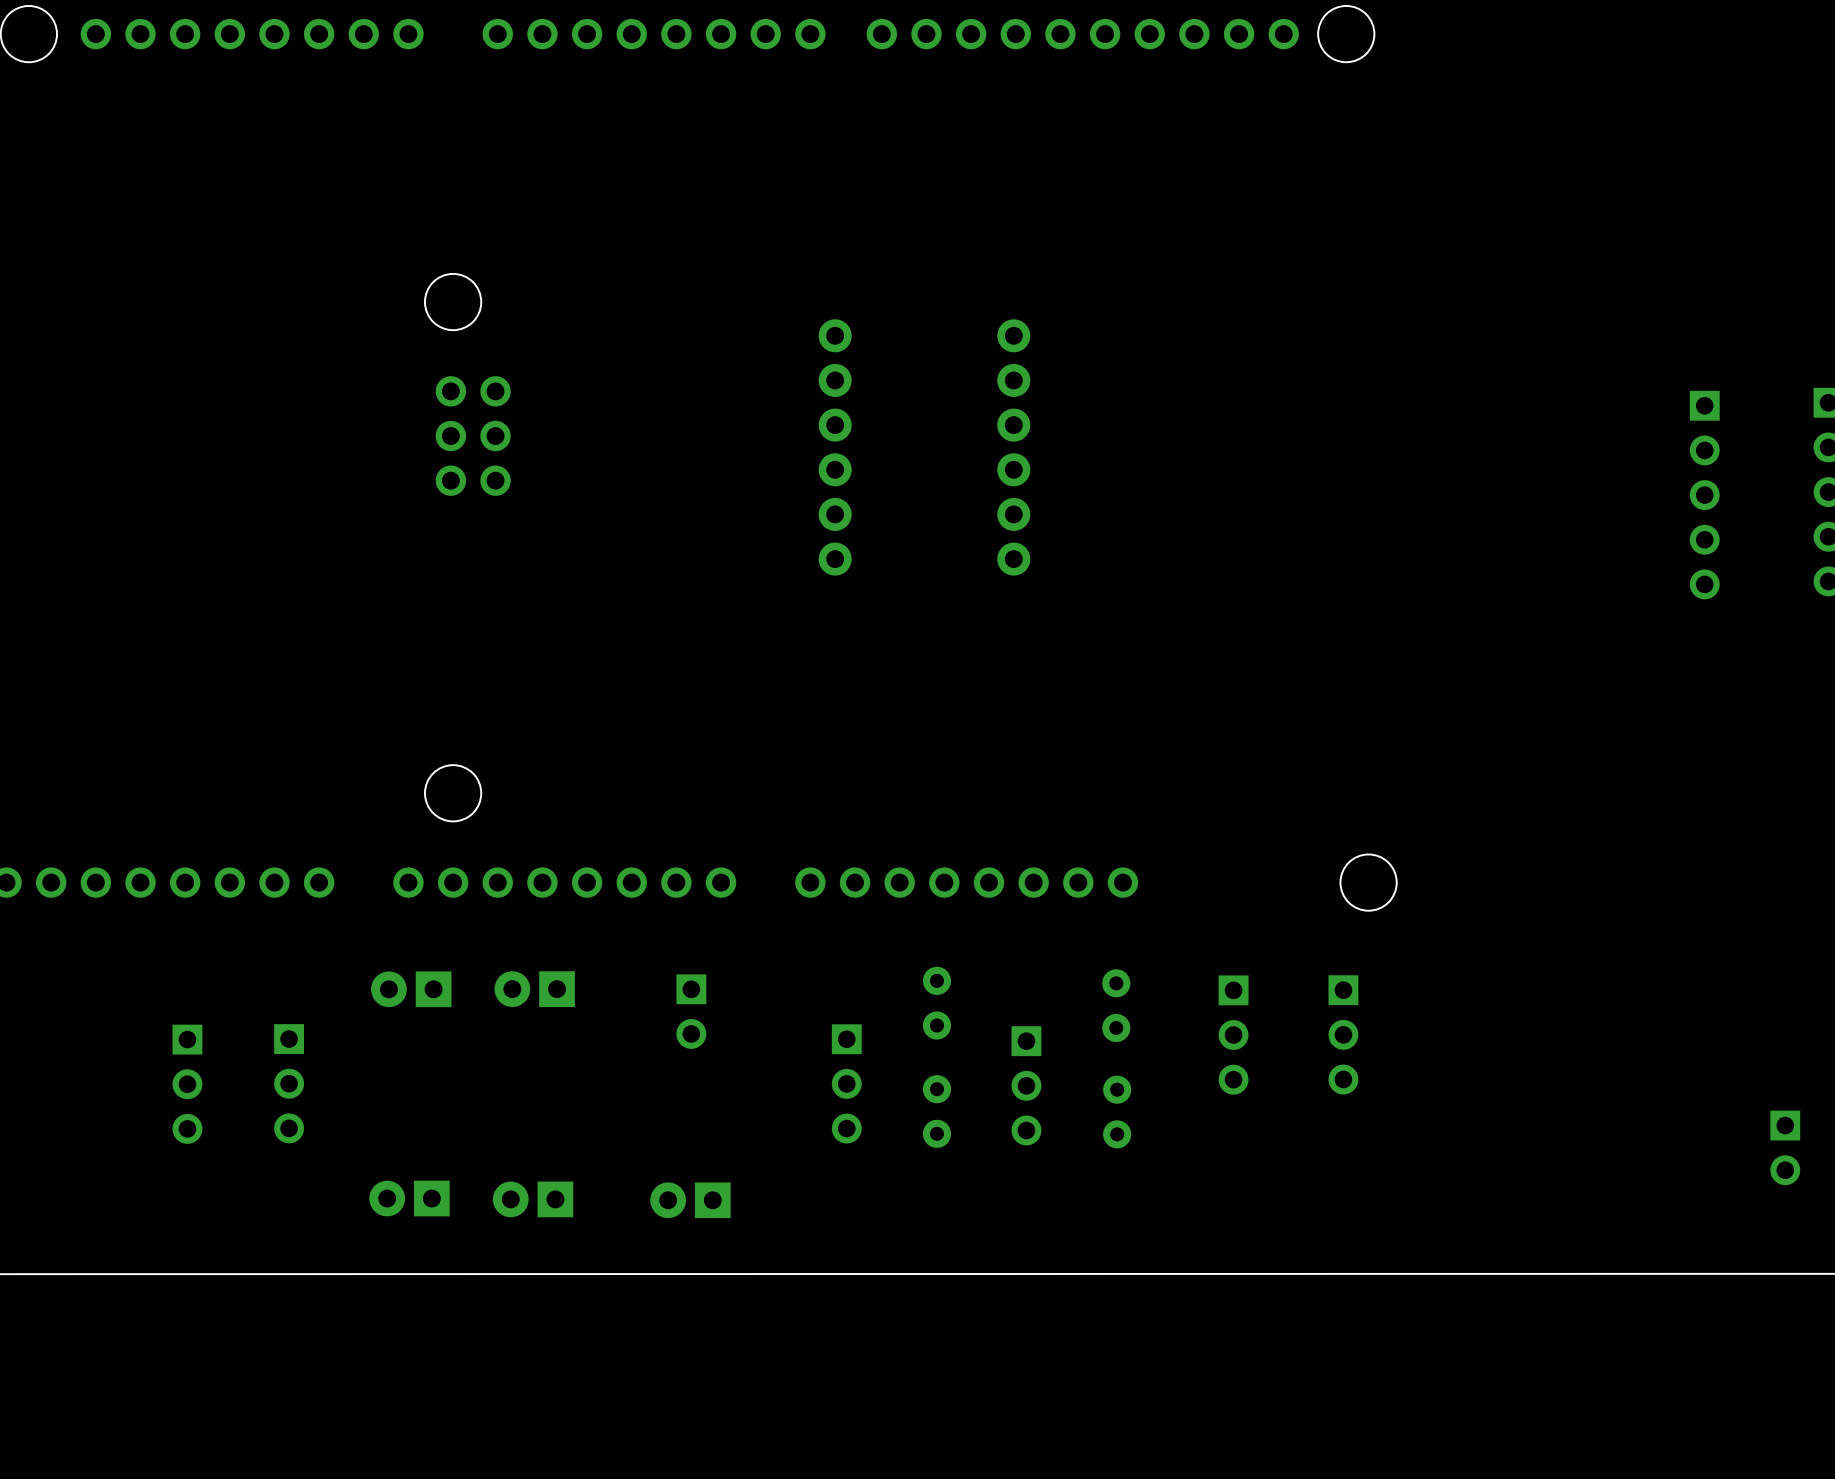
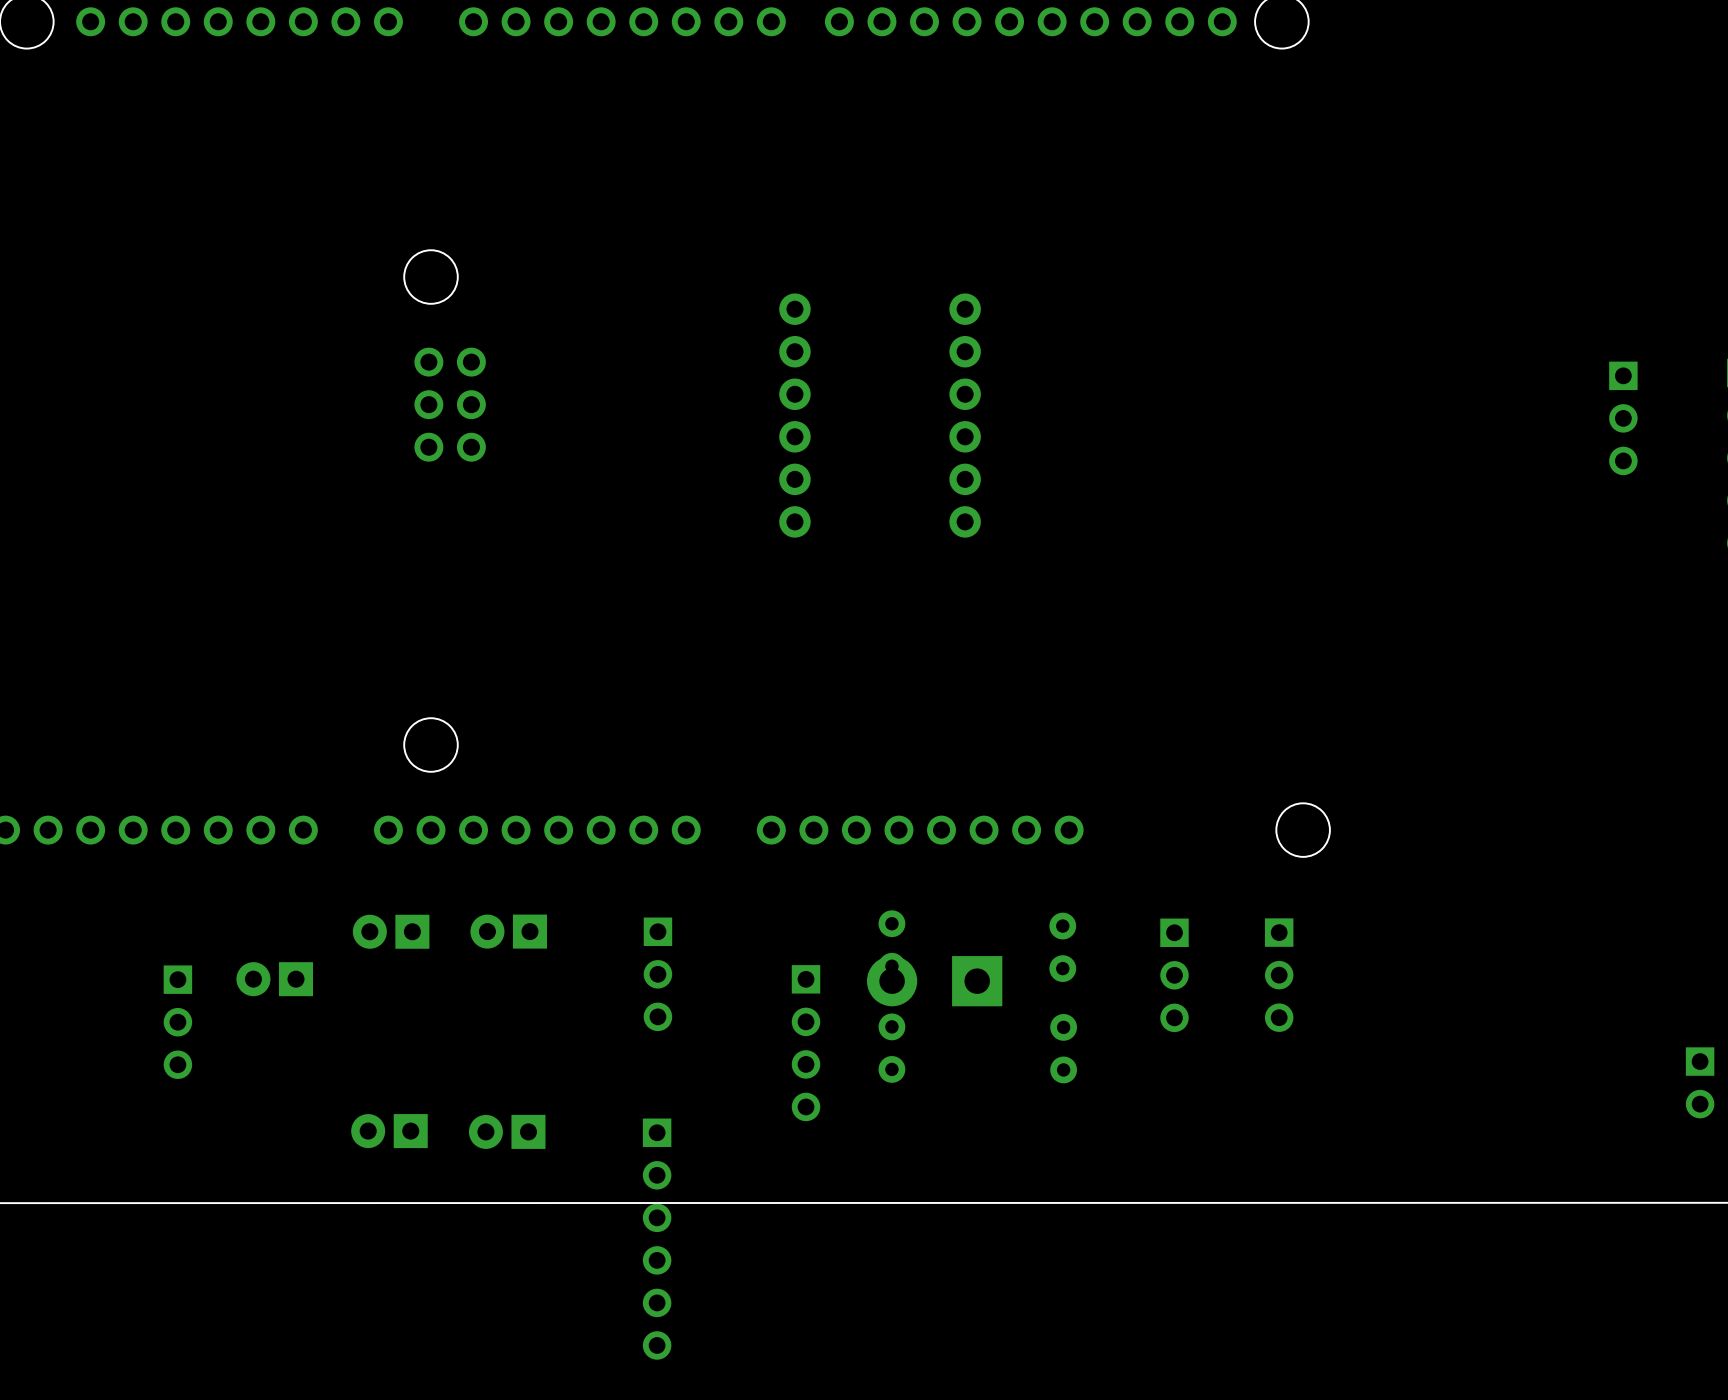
part: (1704, 495) -> none
part: none -> (934, 981)
part: (289, 1083) -> none
part position: (846, 1083) -> (657, 974)
part: (1026, 1085) -> none
part: none -> (806, 1043)
part position: (690, 1200) -> (274, 979)
part: none -> (657, 1239)

